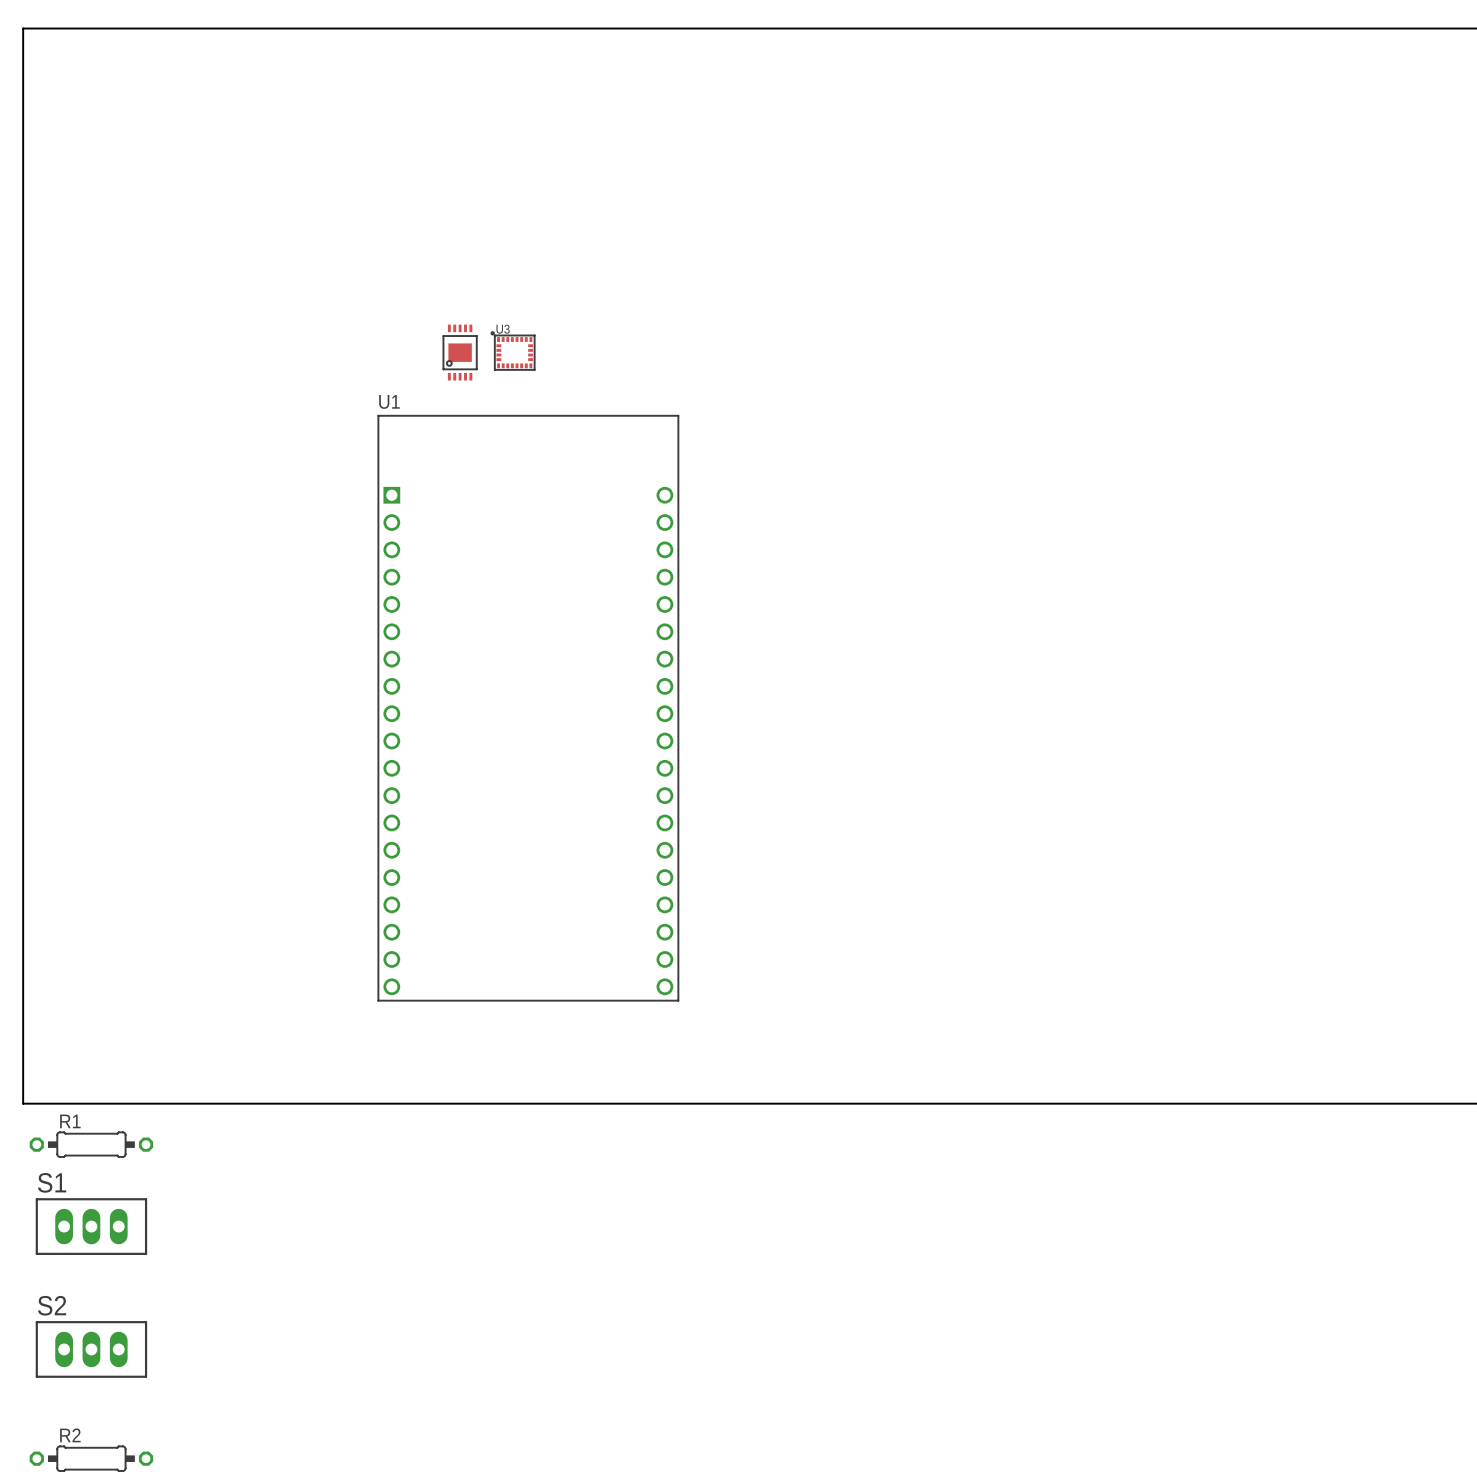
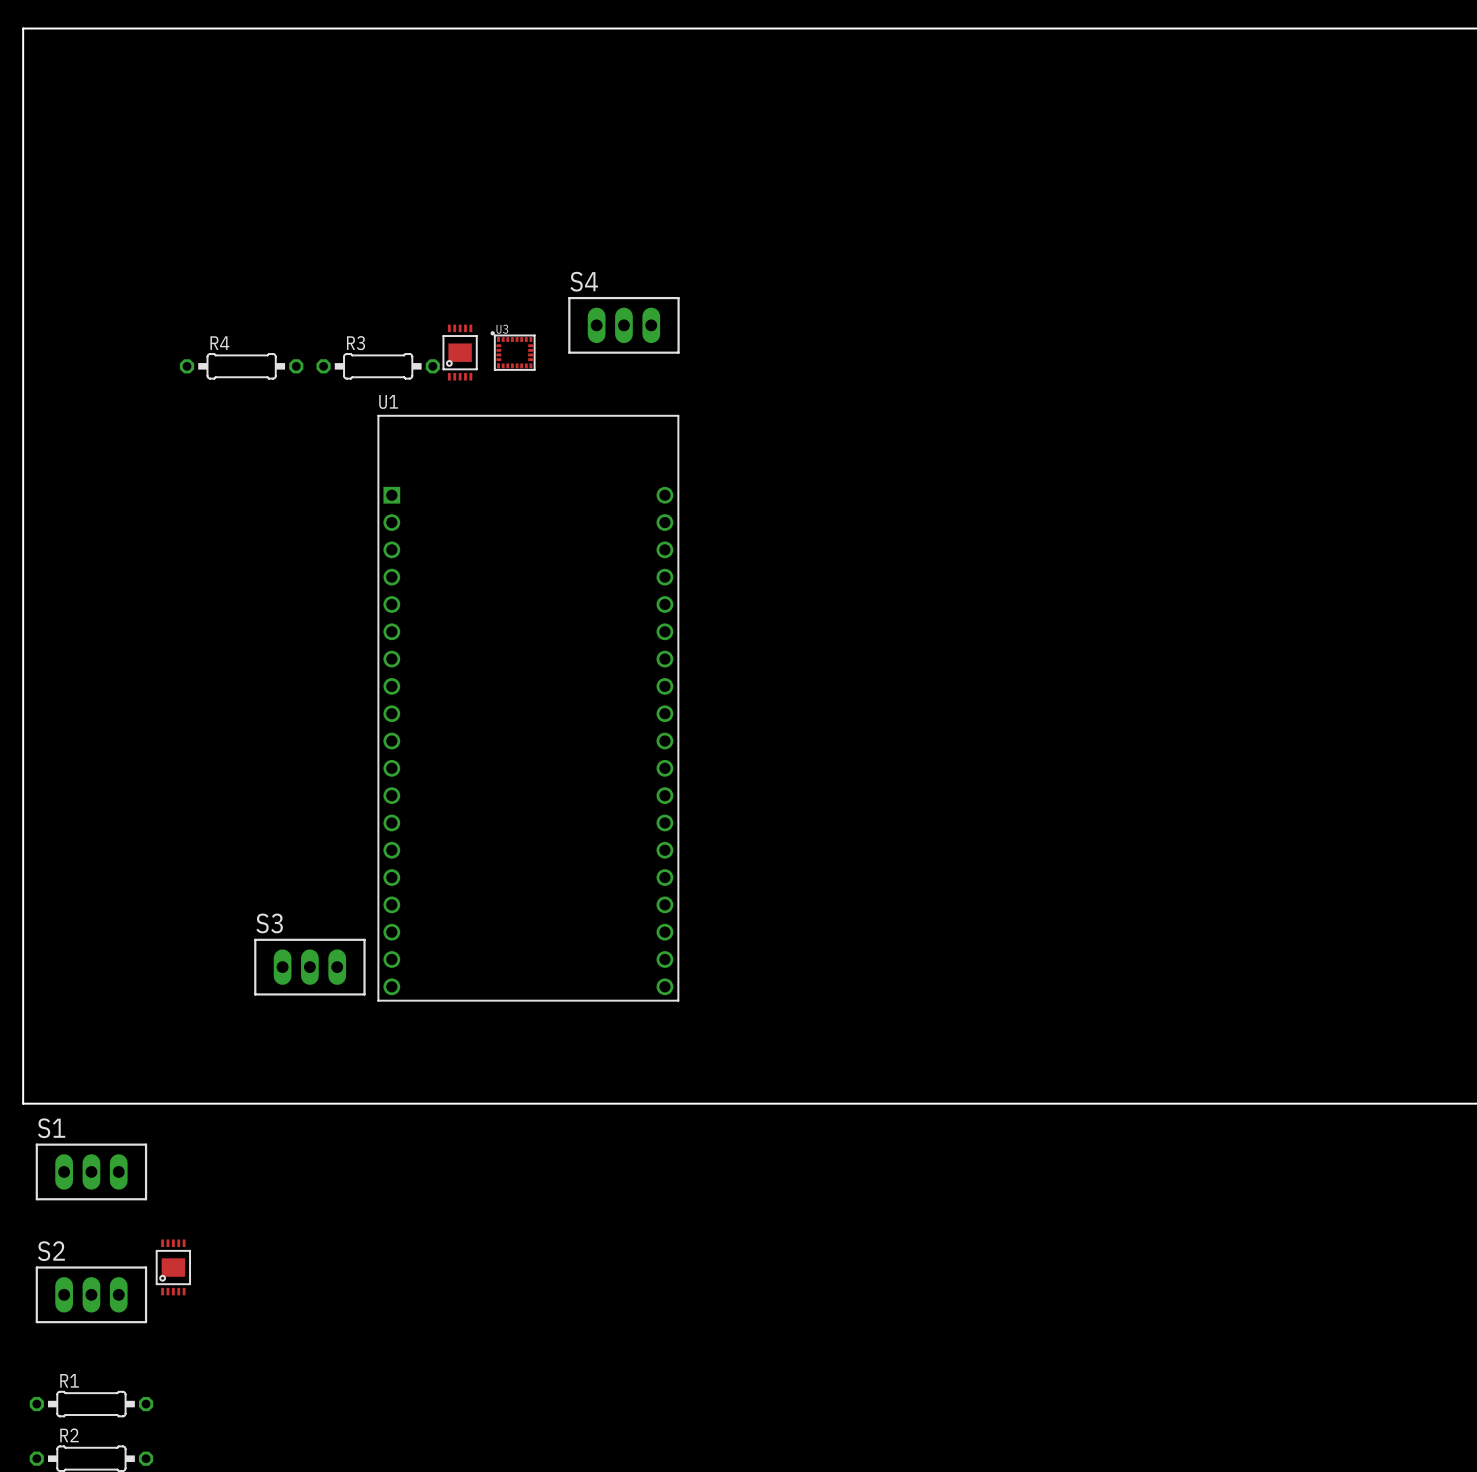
S4: none -> (623, 325)
R4: none -> (241, 366)
R3: none -> (378, 366)
S3: none -> (309, 967)
R1 position: (91, 1144) -> (91, 1404)
S1 position: (91, 1226) -> (91, 1171)
part: none -> (173, 1267)
S2 position: (91, 1349) -> (91, 1294)

